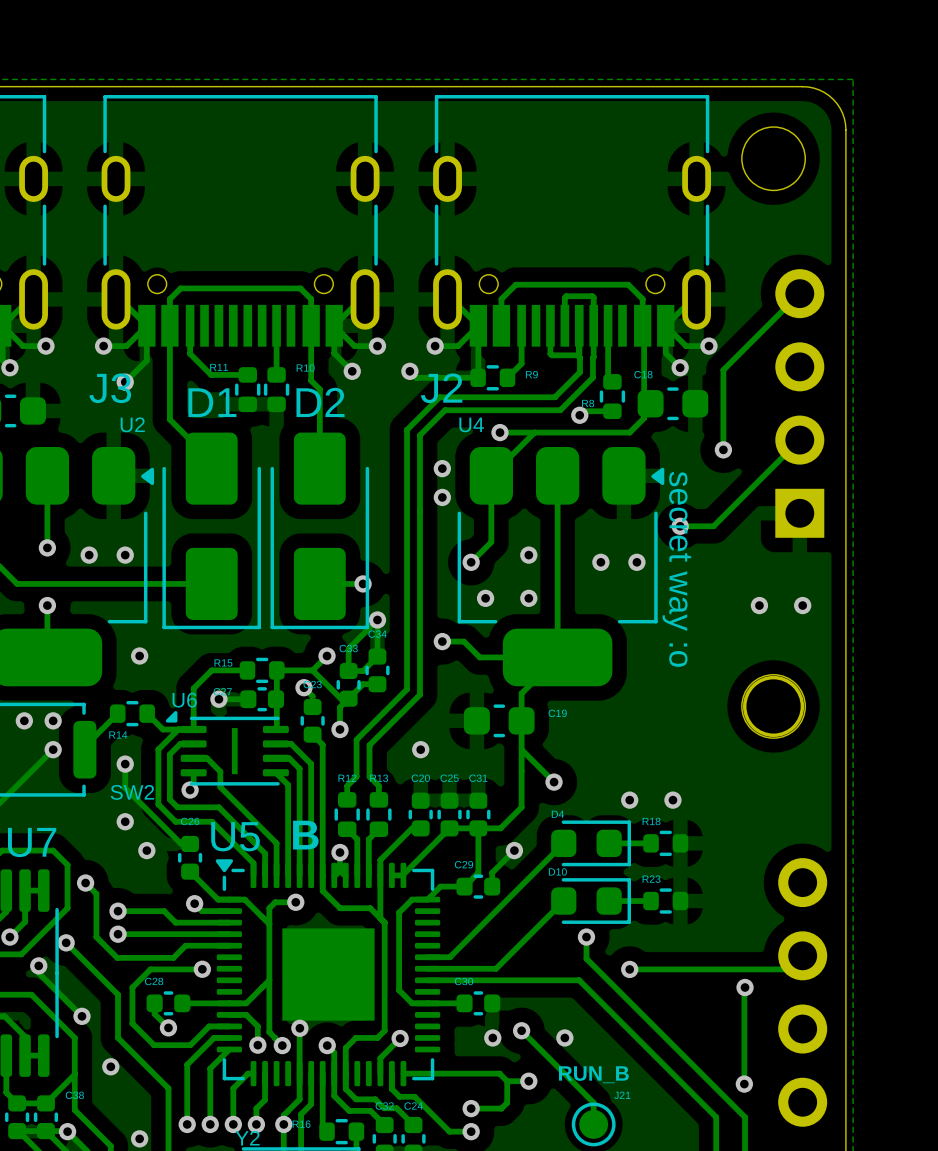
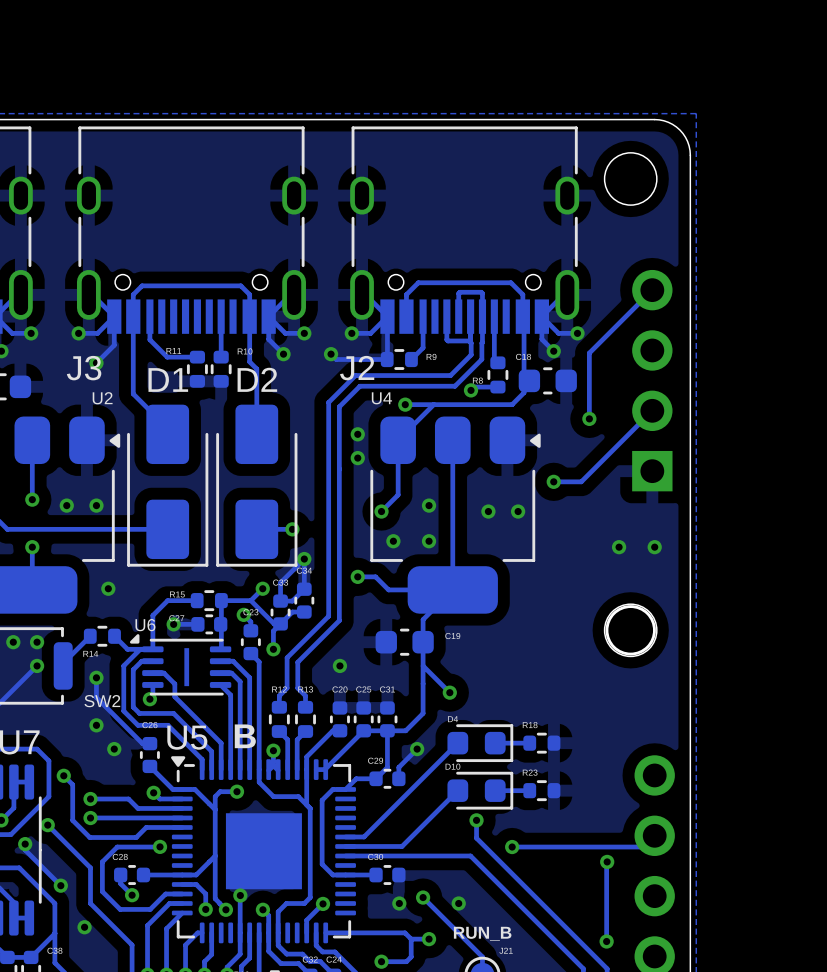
text: secret way :o (676, 569) -> none
via: (629, 800) -> none
via: (672, 800) -> none

